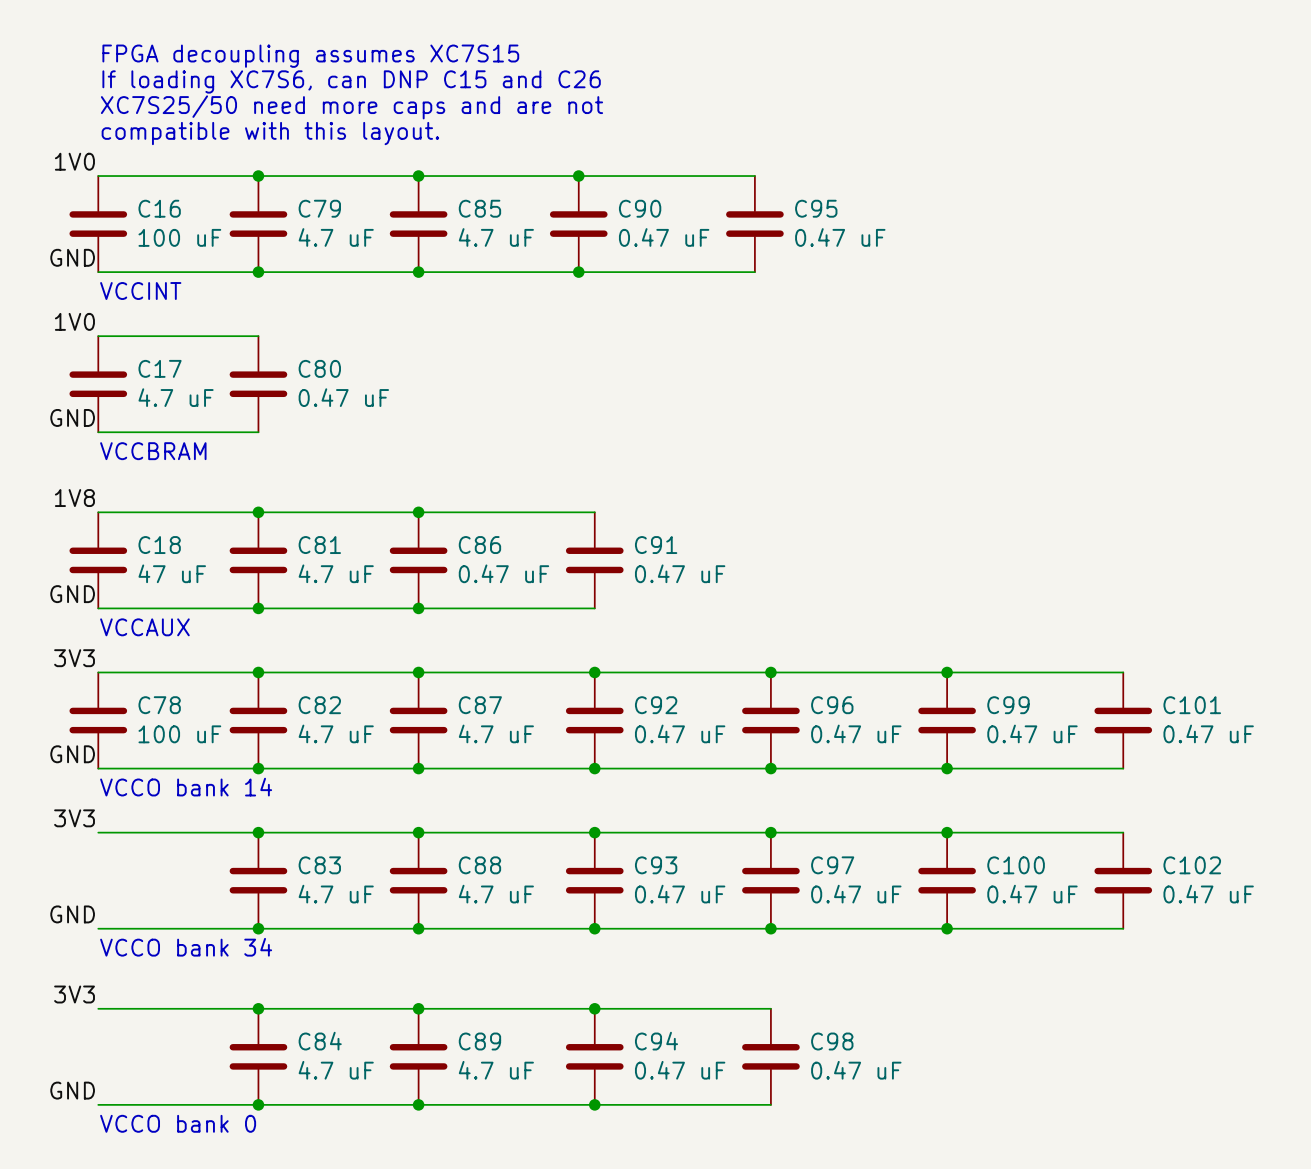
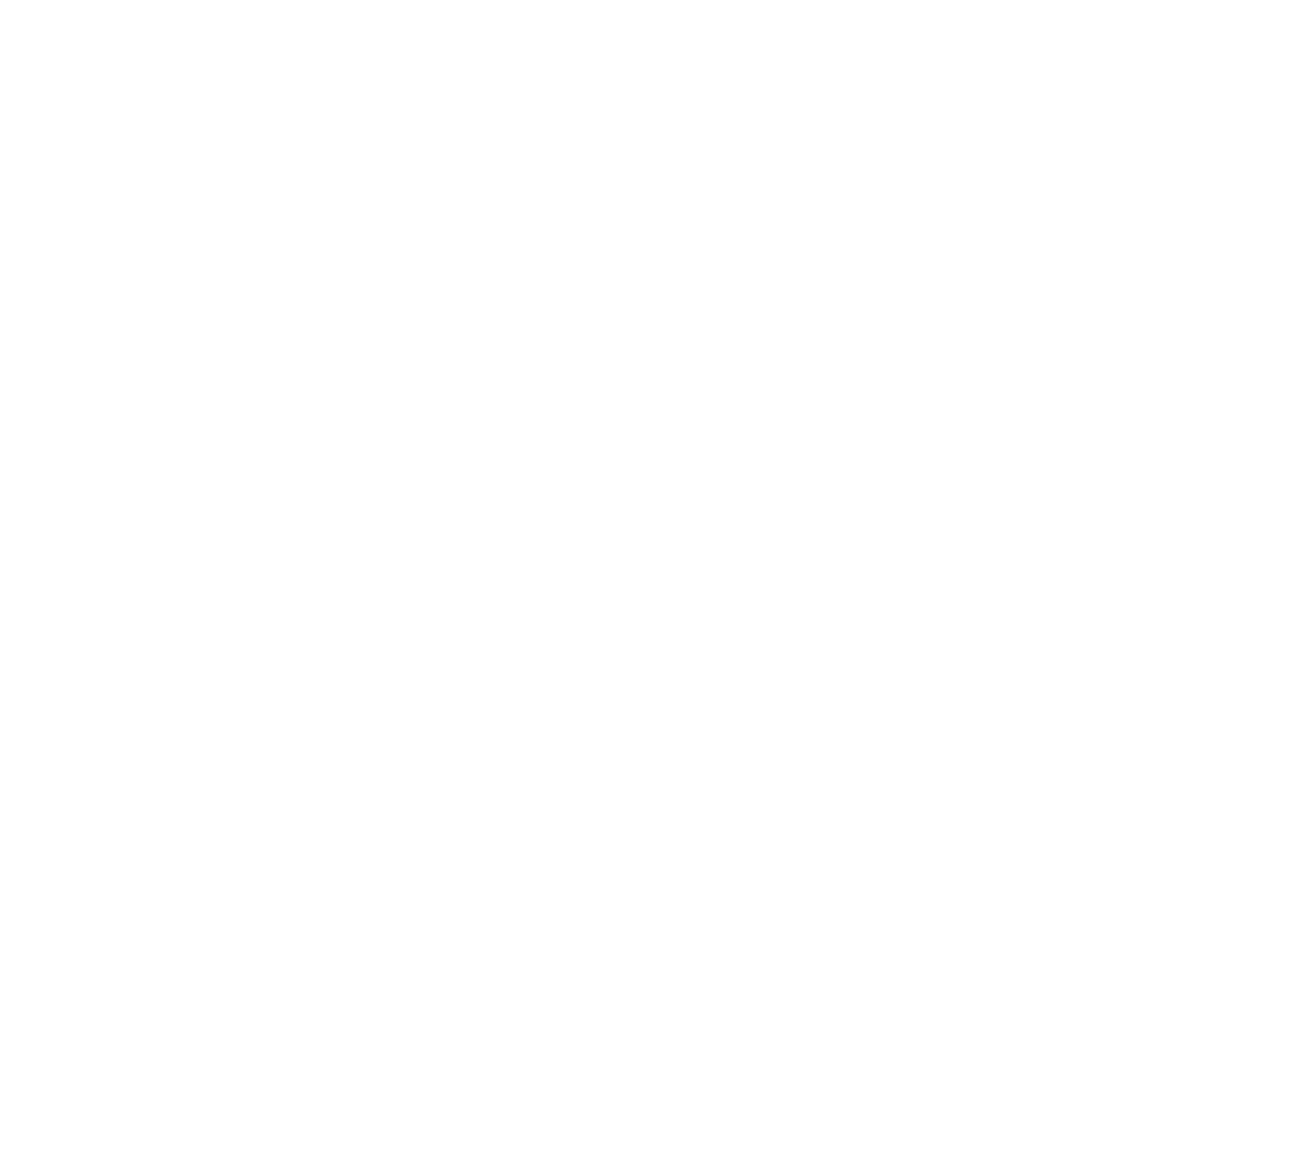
text: FPGA decoupling assumes XC7S15 (310, 56) -> none
text: If loading XC7S6, can DNP C15 and C26 (351, 81) -> none
text: XC7S25/50 need more caps and are not (351, 107) -> none
text: compatible with this layout. (270, 133) -> none
label: 1V0 (74, 161) -> none
wire: (98, 176) (754, 176) -> none
junction: (258, 176) -> none
junction: (418, 176) -> none
junction: (578, 176) -> none
C16: 100 uF (98, 224) -> none
C79: 4.7 uF (258, 224) -> none
C85: 4.7 uF (418, 224) -> none
C90: 0.47 uF (578, 224) -> none
C95: 0.47 uF (754, 224) -> none
label: GND (72, 257) -> none
wire: (98, 272) (754, 272) -> none
junction: (258, 272) -> none
junction: (418, 272) -> none
junction: (578, 272) -> none
text: VCCINT (140, 291) -> none
label: 1V0 (74, 321) -> none
wire: (98, 336) (258, 336) -> none
C17: 4.7 uF (98, 384) -> none
C80: 0.47 uF (258, 384) -> none
label: GND (72, 417) -> none
wire: (98, 432) (258, 432) -> none
text: VCCBRAM (153, 451) -> none
label: 1V8 (74, 498) -> none
wire: (98, 512) (594, 512) -> none
junction: (258, 512) -> none
junction: (418, 512) -> none
C18: 47 uF (98, 560) -> none
C81: 4.7 uF (258, 560) -> none
C86: 0.47 uF (418, 560) -> none
C91: 0.47 uF (594, 560) -> none
label: GND (72, 594) -> none
wire: (98, 608) (594, 608) -> none
junction: (258, 608) -> none
junction: (418, 608) -> none
text: VCCAUX (144, 627) -> none
label: 3V3 (74, 658) -> none
wire: (98, 672) (1123, 672) -> none
junction: (258, 672) -> none
junction: (418, 672) -> none
junction: (594, 672) -> none
junction: (770, 672) -> none
junction: (947, 672) -> none
C78: 100 uF (98, 720) -> none
C82: 4.7 uF (258, 720) -> none
C87: 4.7 uF (418, 720) -> none
C92: 0.47 uF (594, 720) -> none
C96: 0.47 uF (770, 720) -> none
C99: 0.47 uF (947, 720) -> none
C101: 0.47 uF (1123, 720) -> none
label: GND (72, 754) -> none
wire: (98, 768) (1123, 768) -> none
junction: (258, 768) -> none
junction: (418, 768) -> none
junction: (594, 768) -> none
junction: (770, 768) -> none
junction: (947, 768) -> none
text: VCCO bank 14 (186, 787) -> none
label: 3V3 (74, 818) -> none
wire: (98, 832) (1123, 832) -> none
junction: (258, 832) -> none
junction: (418, 832) -> none
junction: (594, 832) -> none
junction: (770, 832) -> none
junction: (947, 832) -> none
C83: 4.7 uF (258, 880) -> none
C88: 4.7 uF (418, 880) -> none
C93: 0.47 uF (594, 880) -> none
C97: 0.47 uF (770, 880) -> none
C100: 0.47 uF (947, 880) -> none
C102: 0.47 uF (1123, 880) -> none
label: GND (72, 914) -> none
wire: (98, 928) (1123, 928) -> none
junction: (258, 928) -> none
junction: (418, 928) -> none
junction: (594, 928) -> none
junction: (770, 928) -> none
junction: (947, 928) -> none
text: VCCO bank 34 (186, 947) -> none
label: 3V3 (74, 994) -> none
wire: (98, 1008) (770, 1008) -> none
junction: (258, 1008) -> none
junction: (418, 1008) -> none
junction: (594, 1008) -> none
C84: 4.7 uF (258, 1056) -> none
C89: 4.7 uF (418, 1056) -> none
C94: 0.47 uF (594, 1056) -> none
C98: 0.47 uF (770, 1056) -> none
label: GND (72, 1090) -> none
wire: (98, 1104) (770, 1104) -> none
junction: (258, 1104) -> none
junction: (418, 1104) -> none
junction: (594, 1104) -> none
text: VCCO bank 0 (178, 1123) -> none

